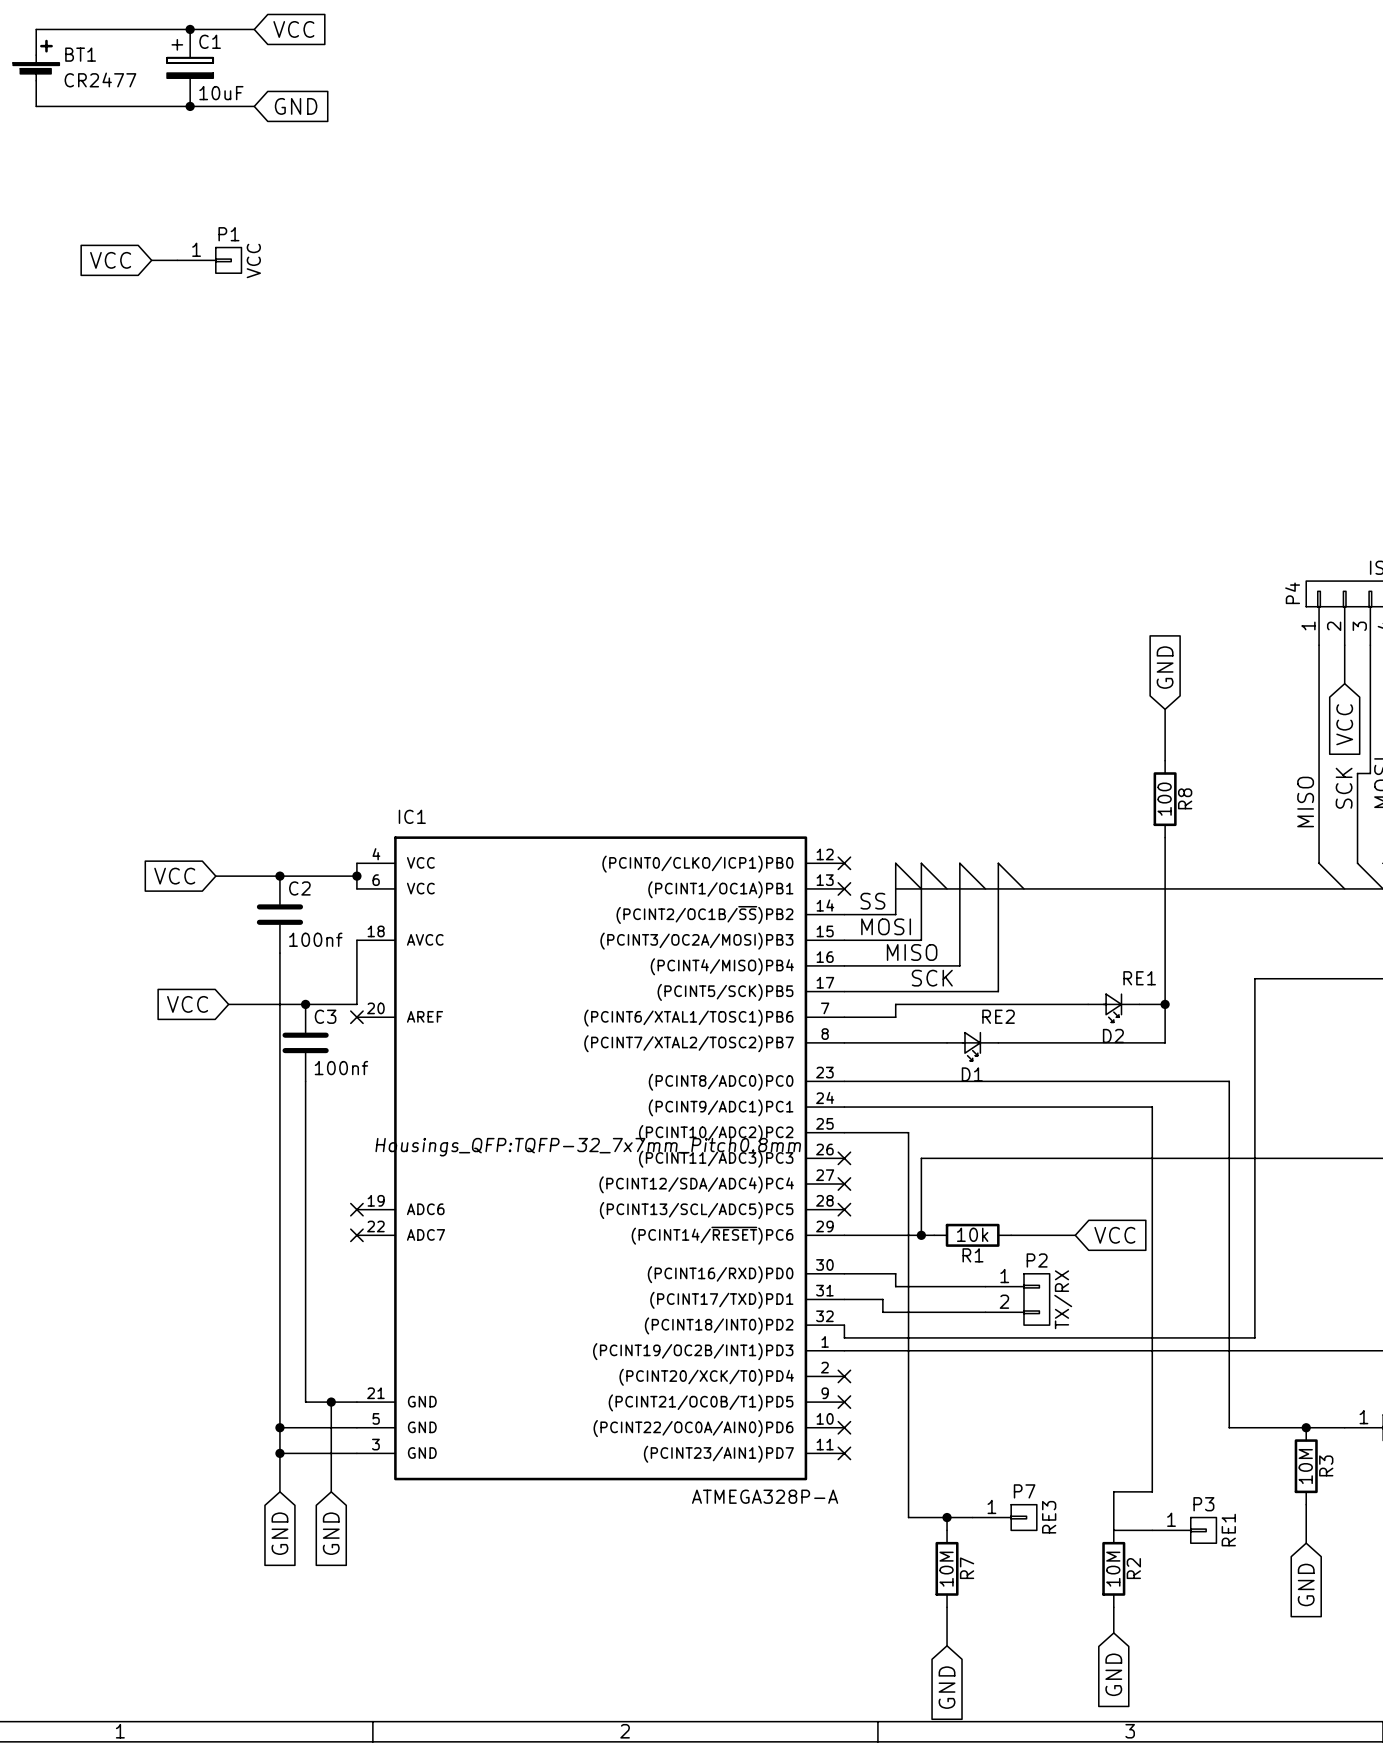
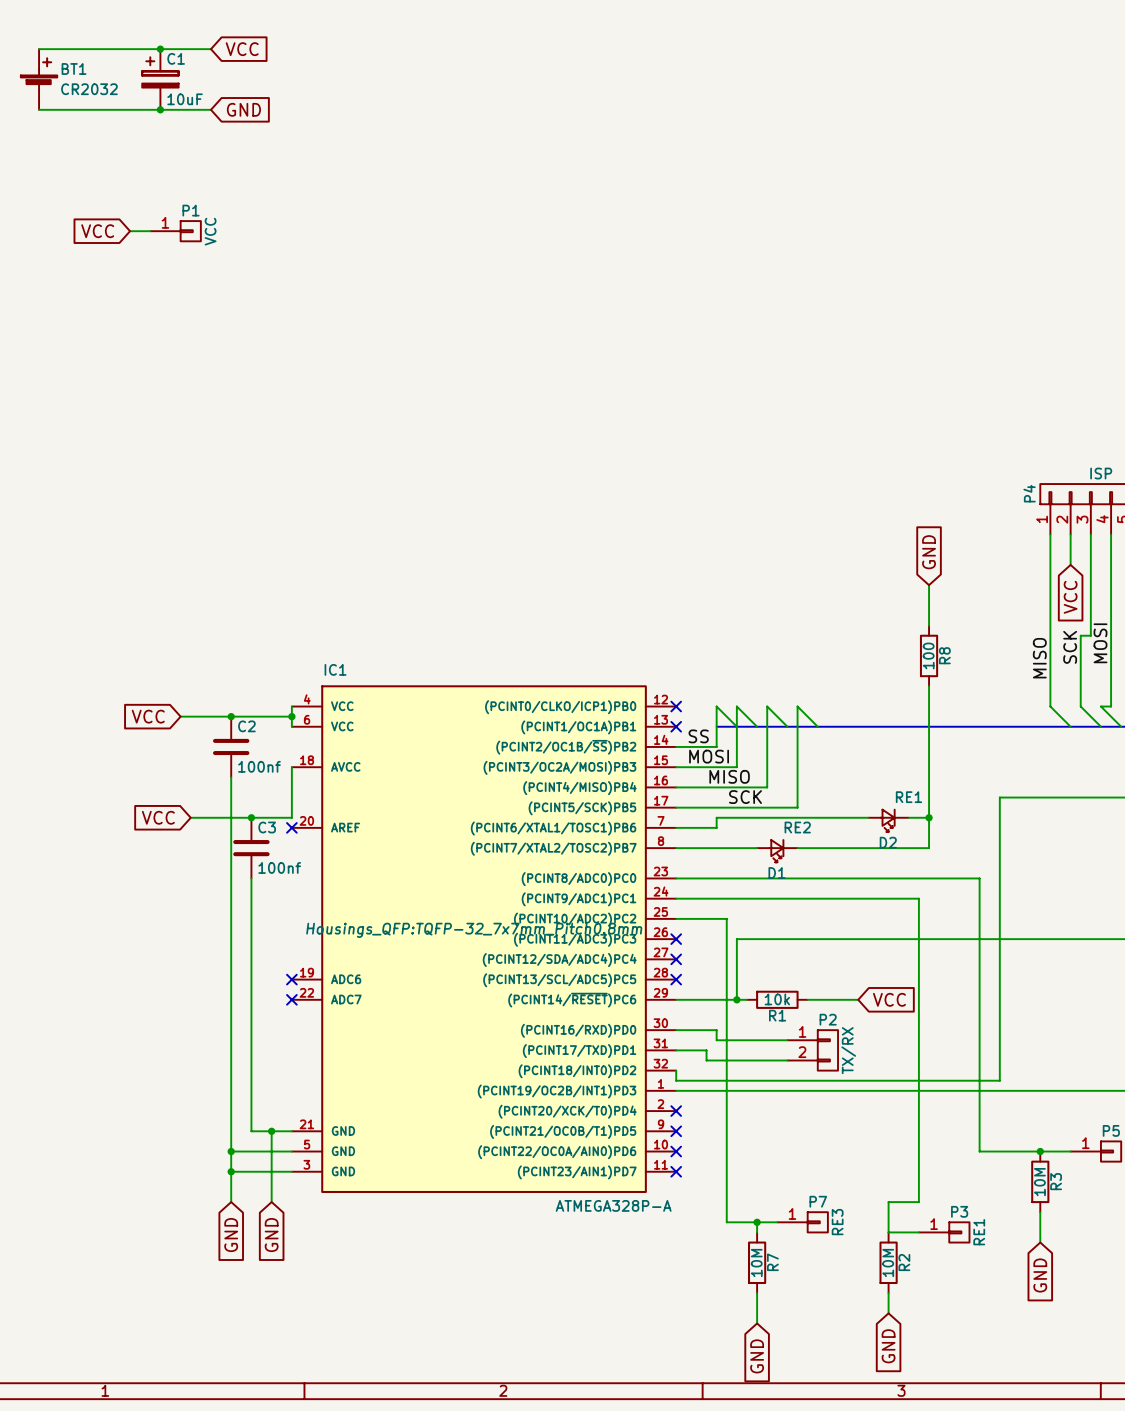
BT1 value: CR2477 (100, 79) -> CR2032 (89, 89)

